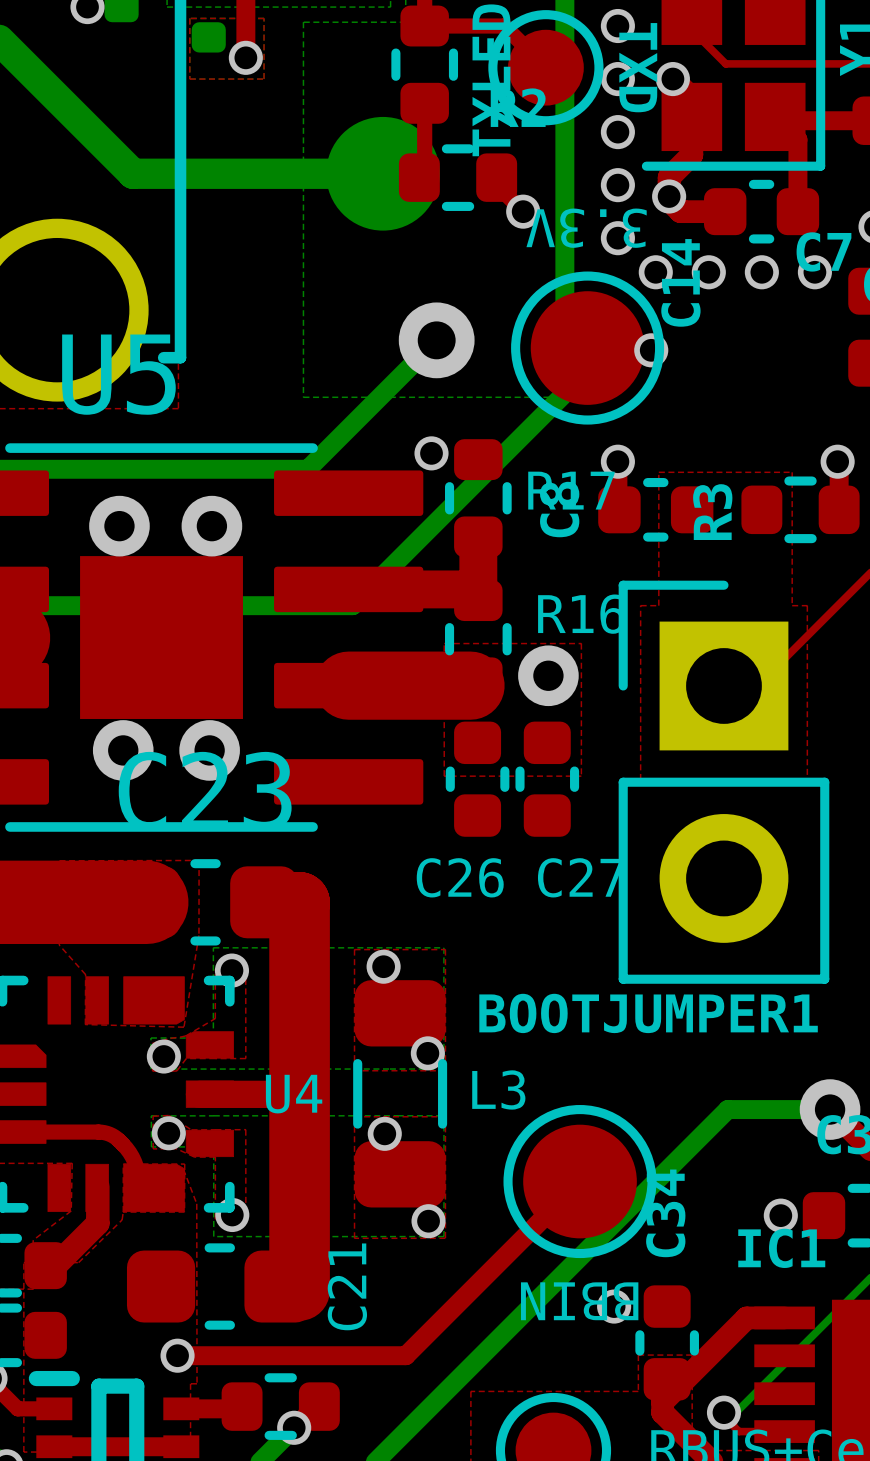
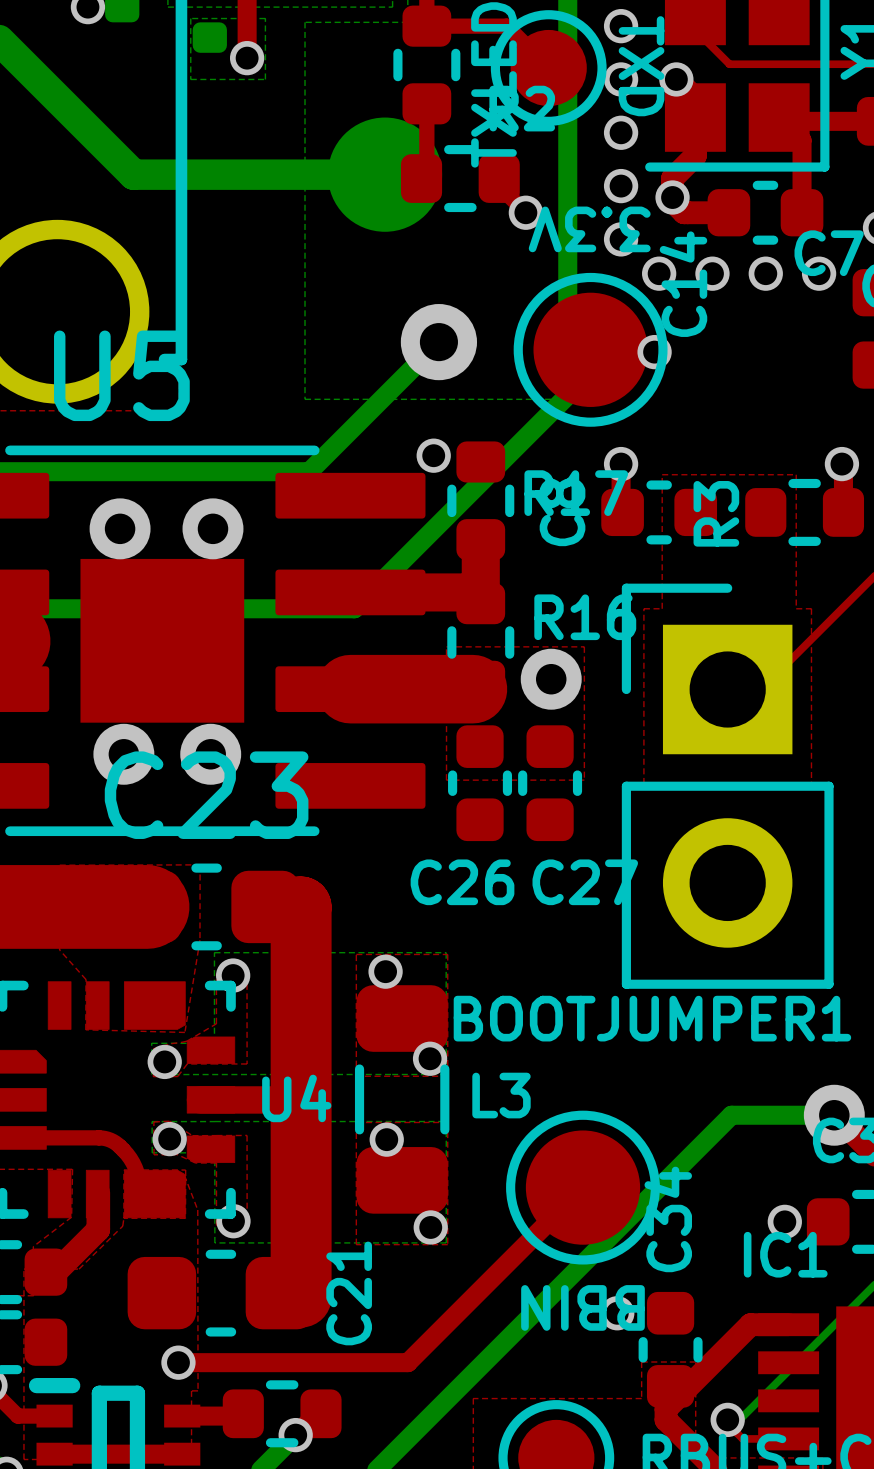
top zone outline: (189, 18) (189, 79) (264, 79) (264, 18) (189, 18) -> none

